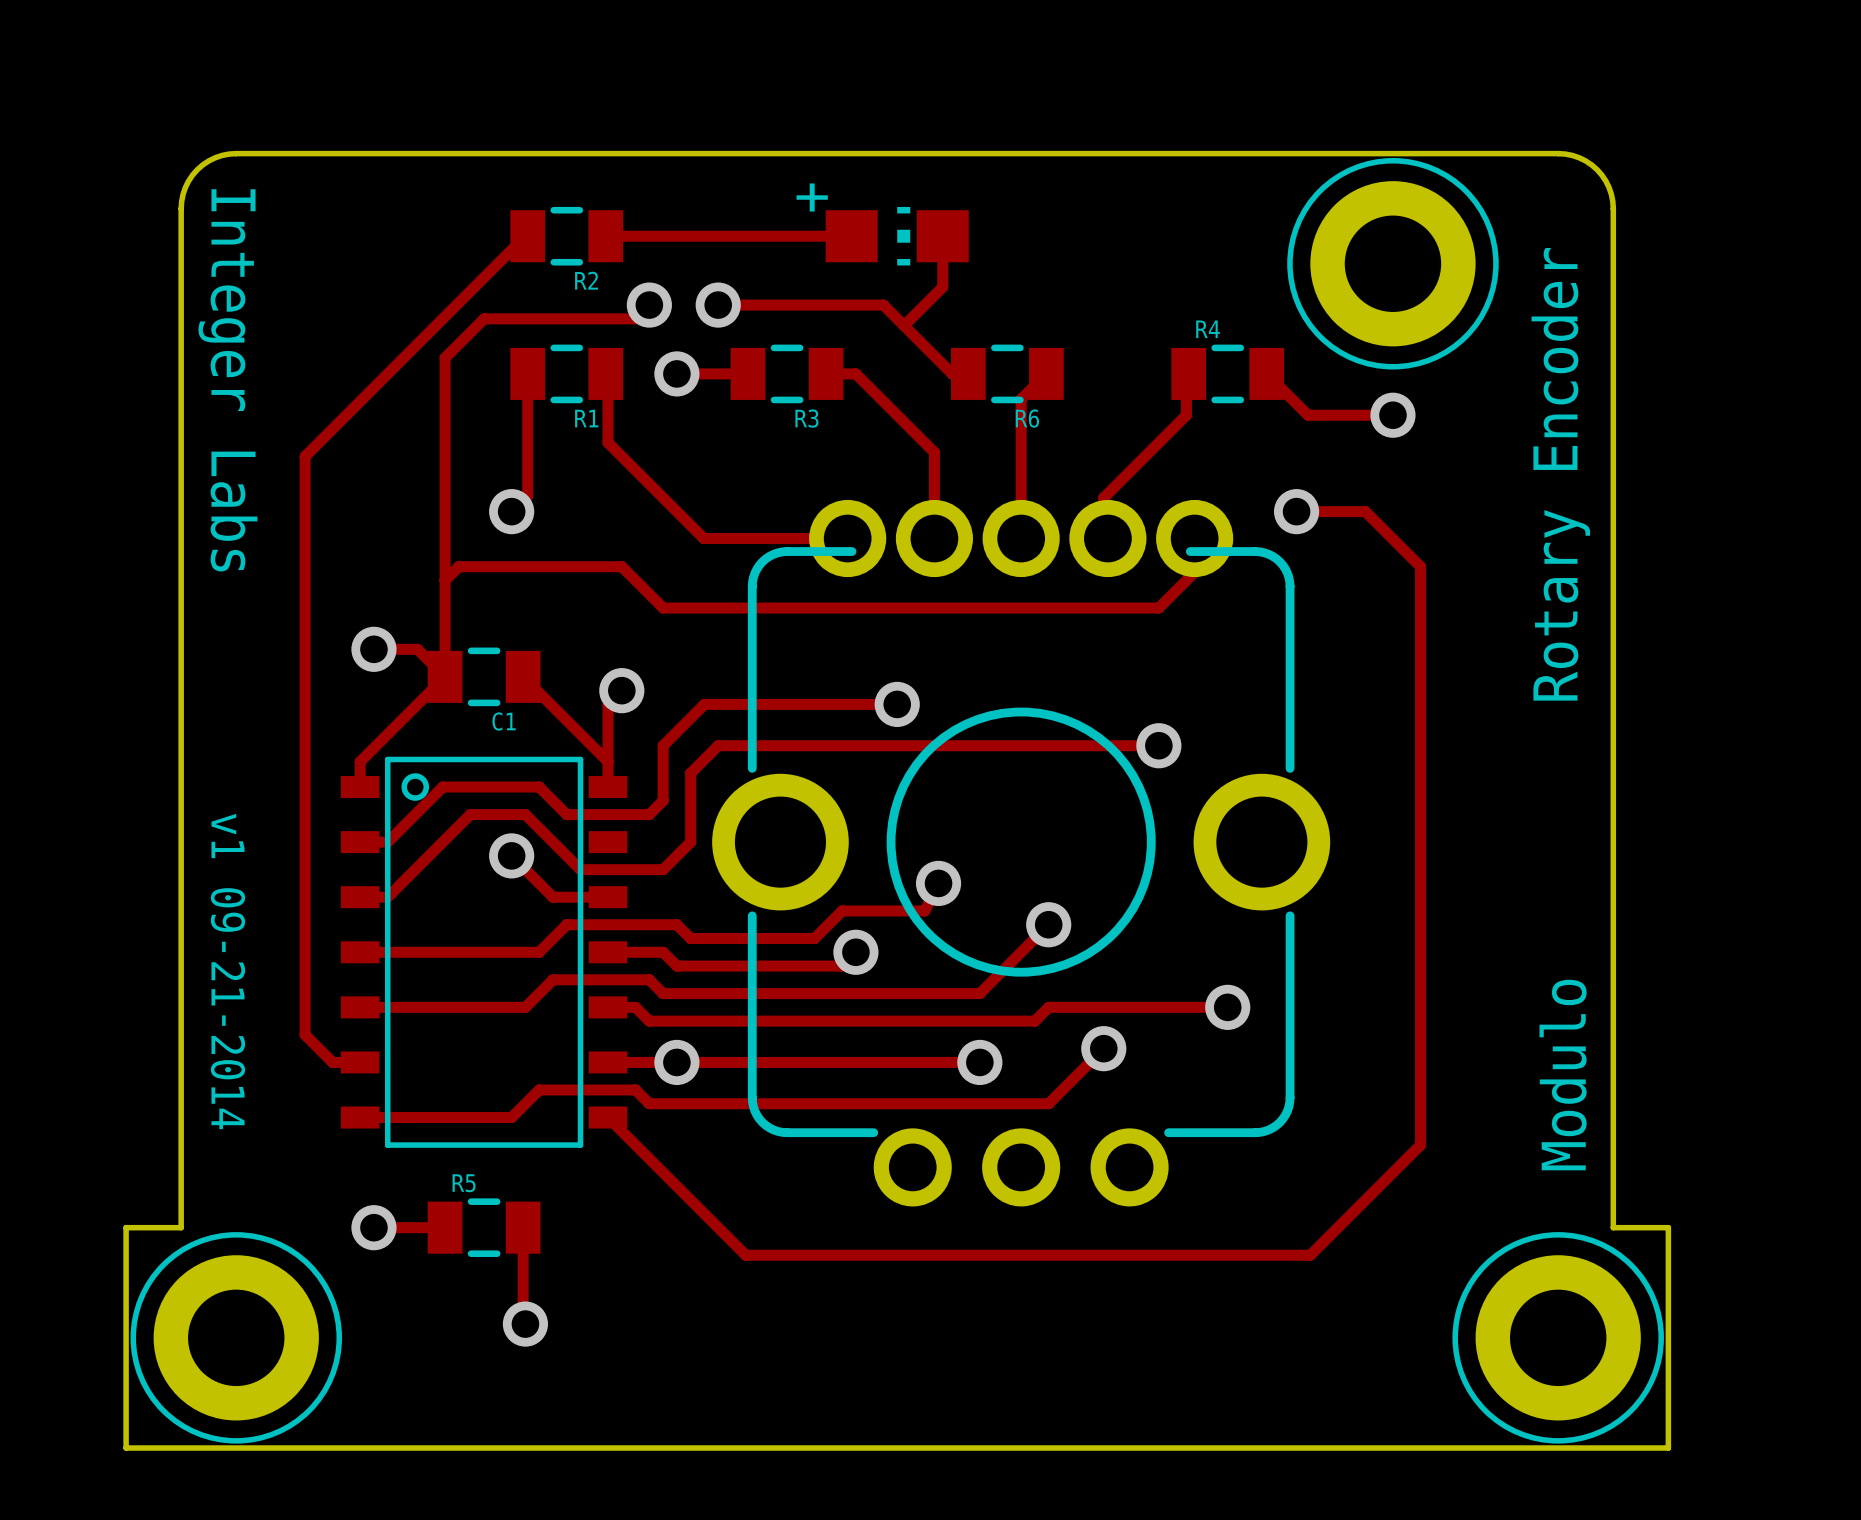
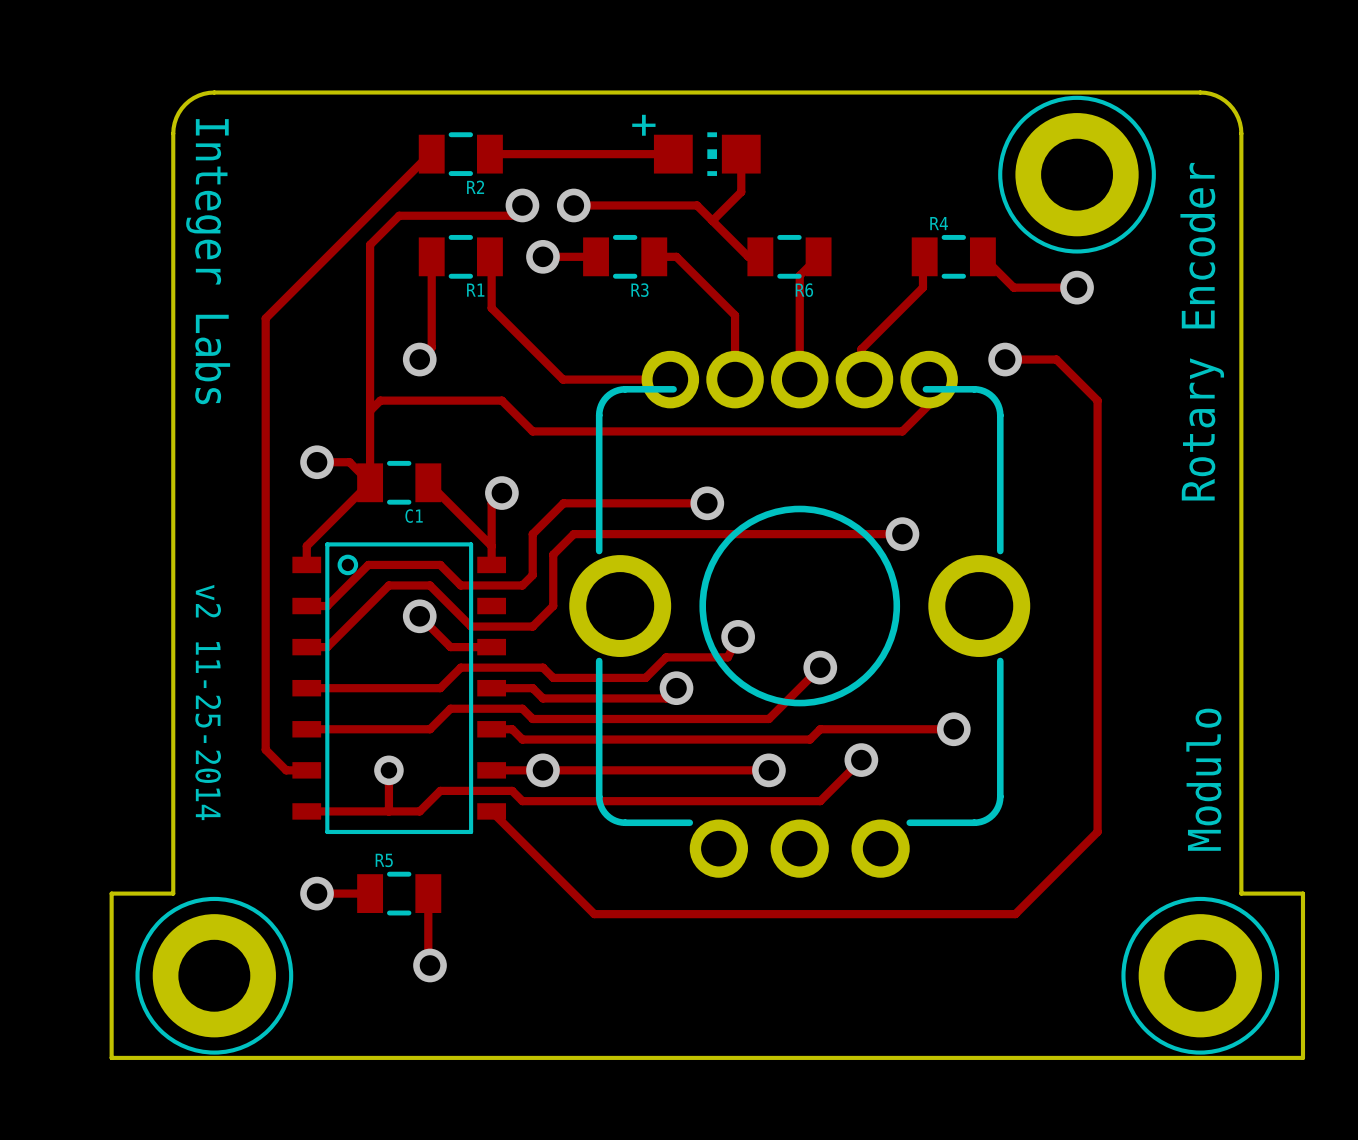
part footprint: [123, 150, 1672, 1451] -> [109, 90, 1306, 1060]
text: v1 09-21-2014 (227, 971) -> v2 11-25-2014 (208, 702)
track: none -> (388, 770) (388, 811)
via: none -> (388, 770)

